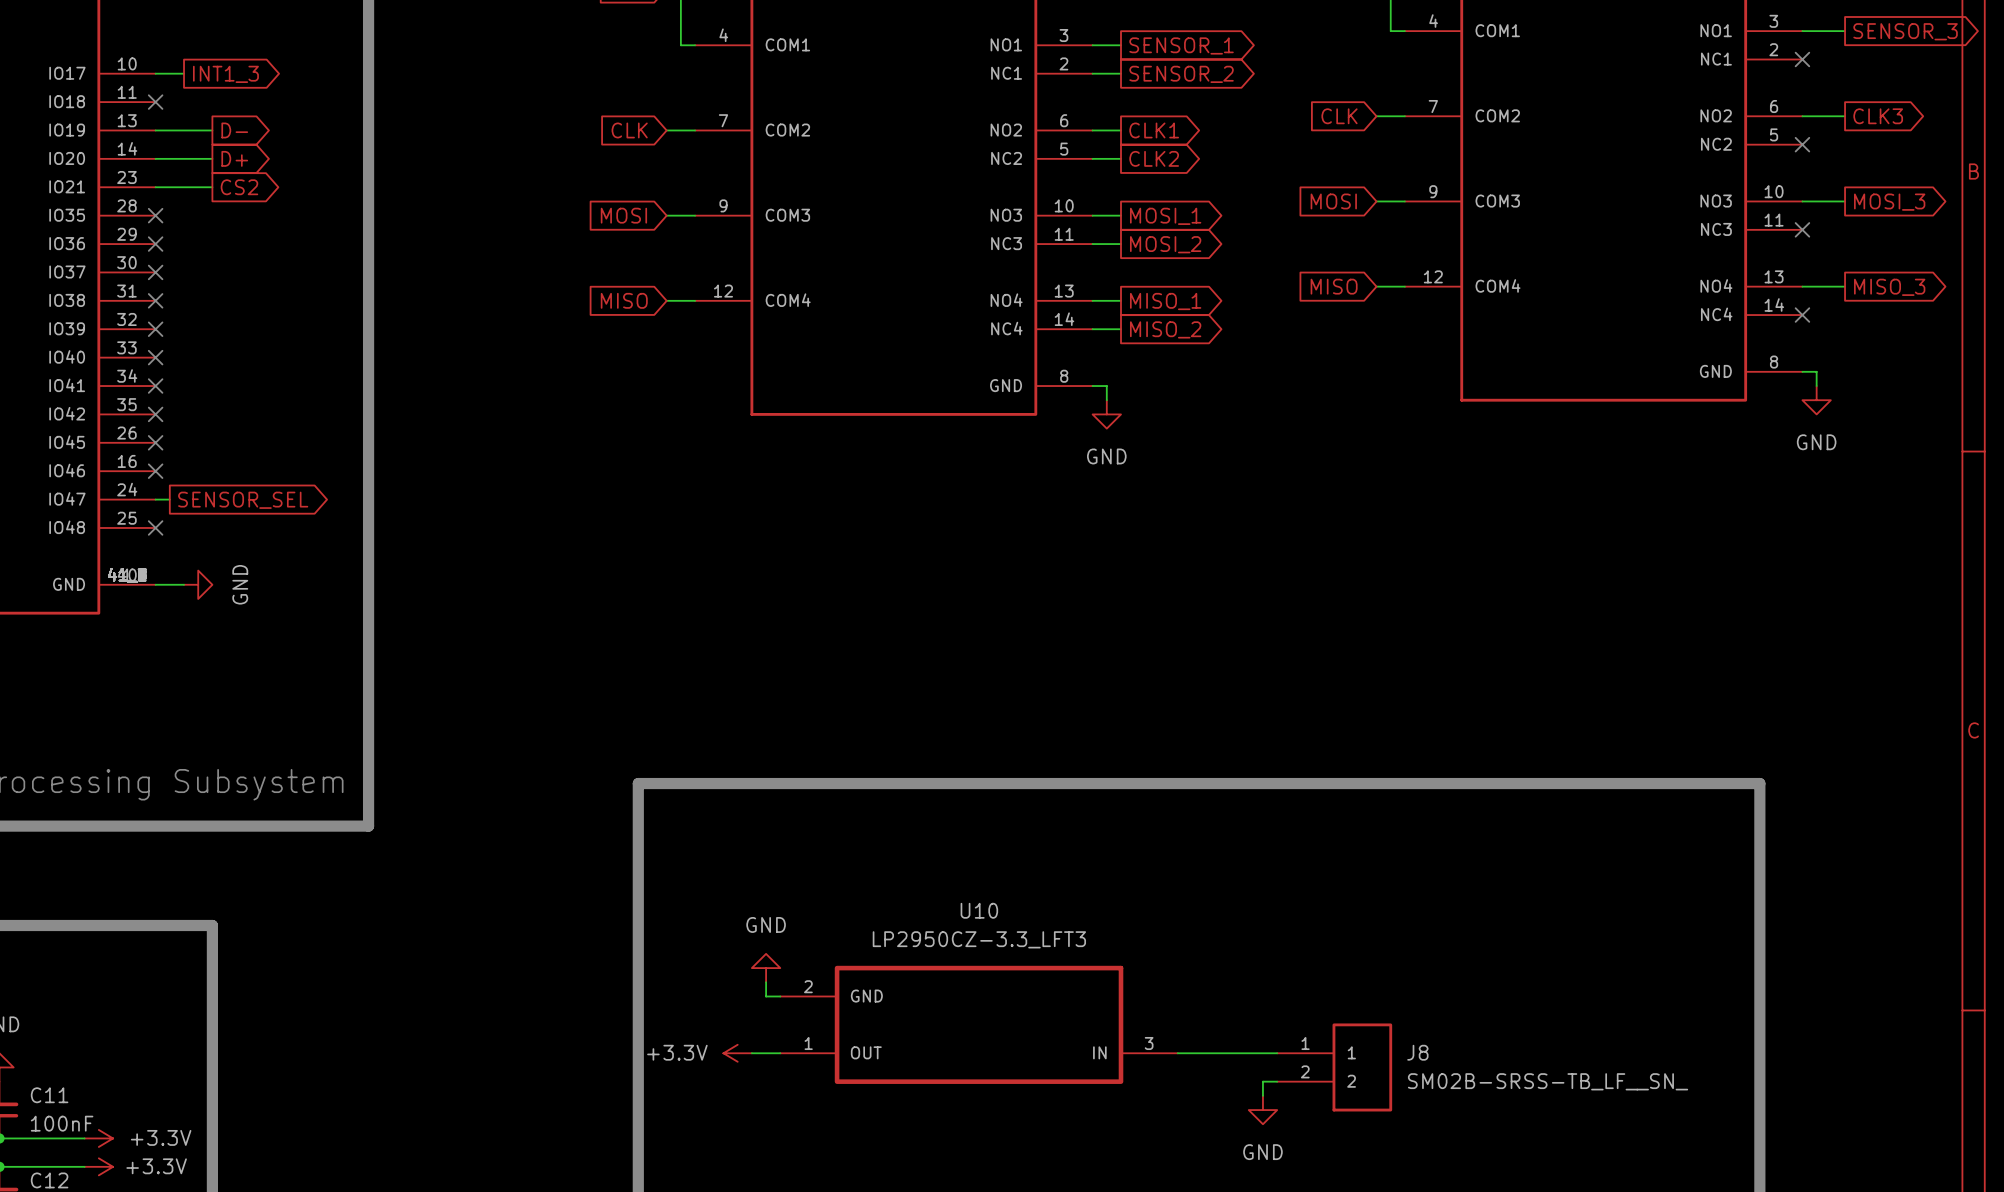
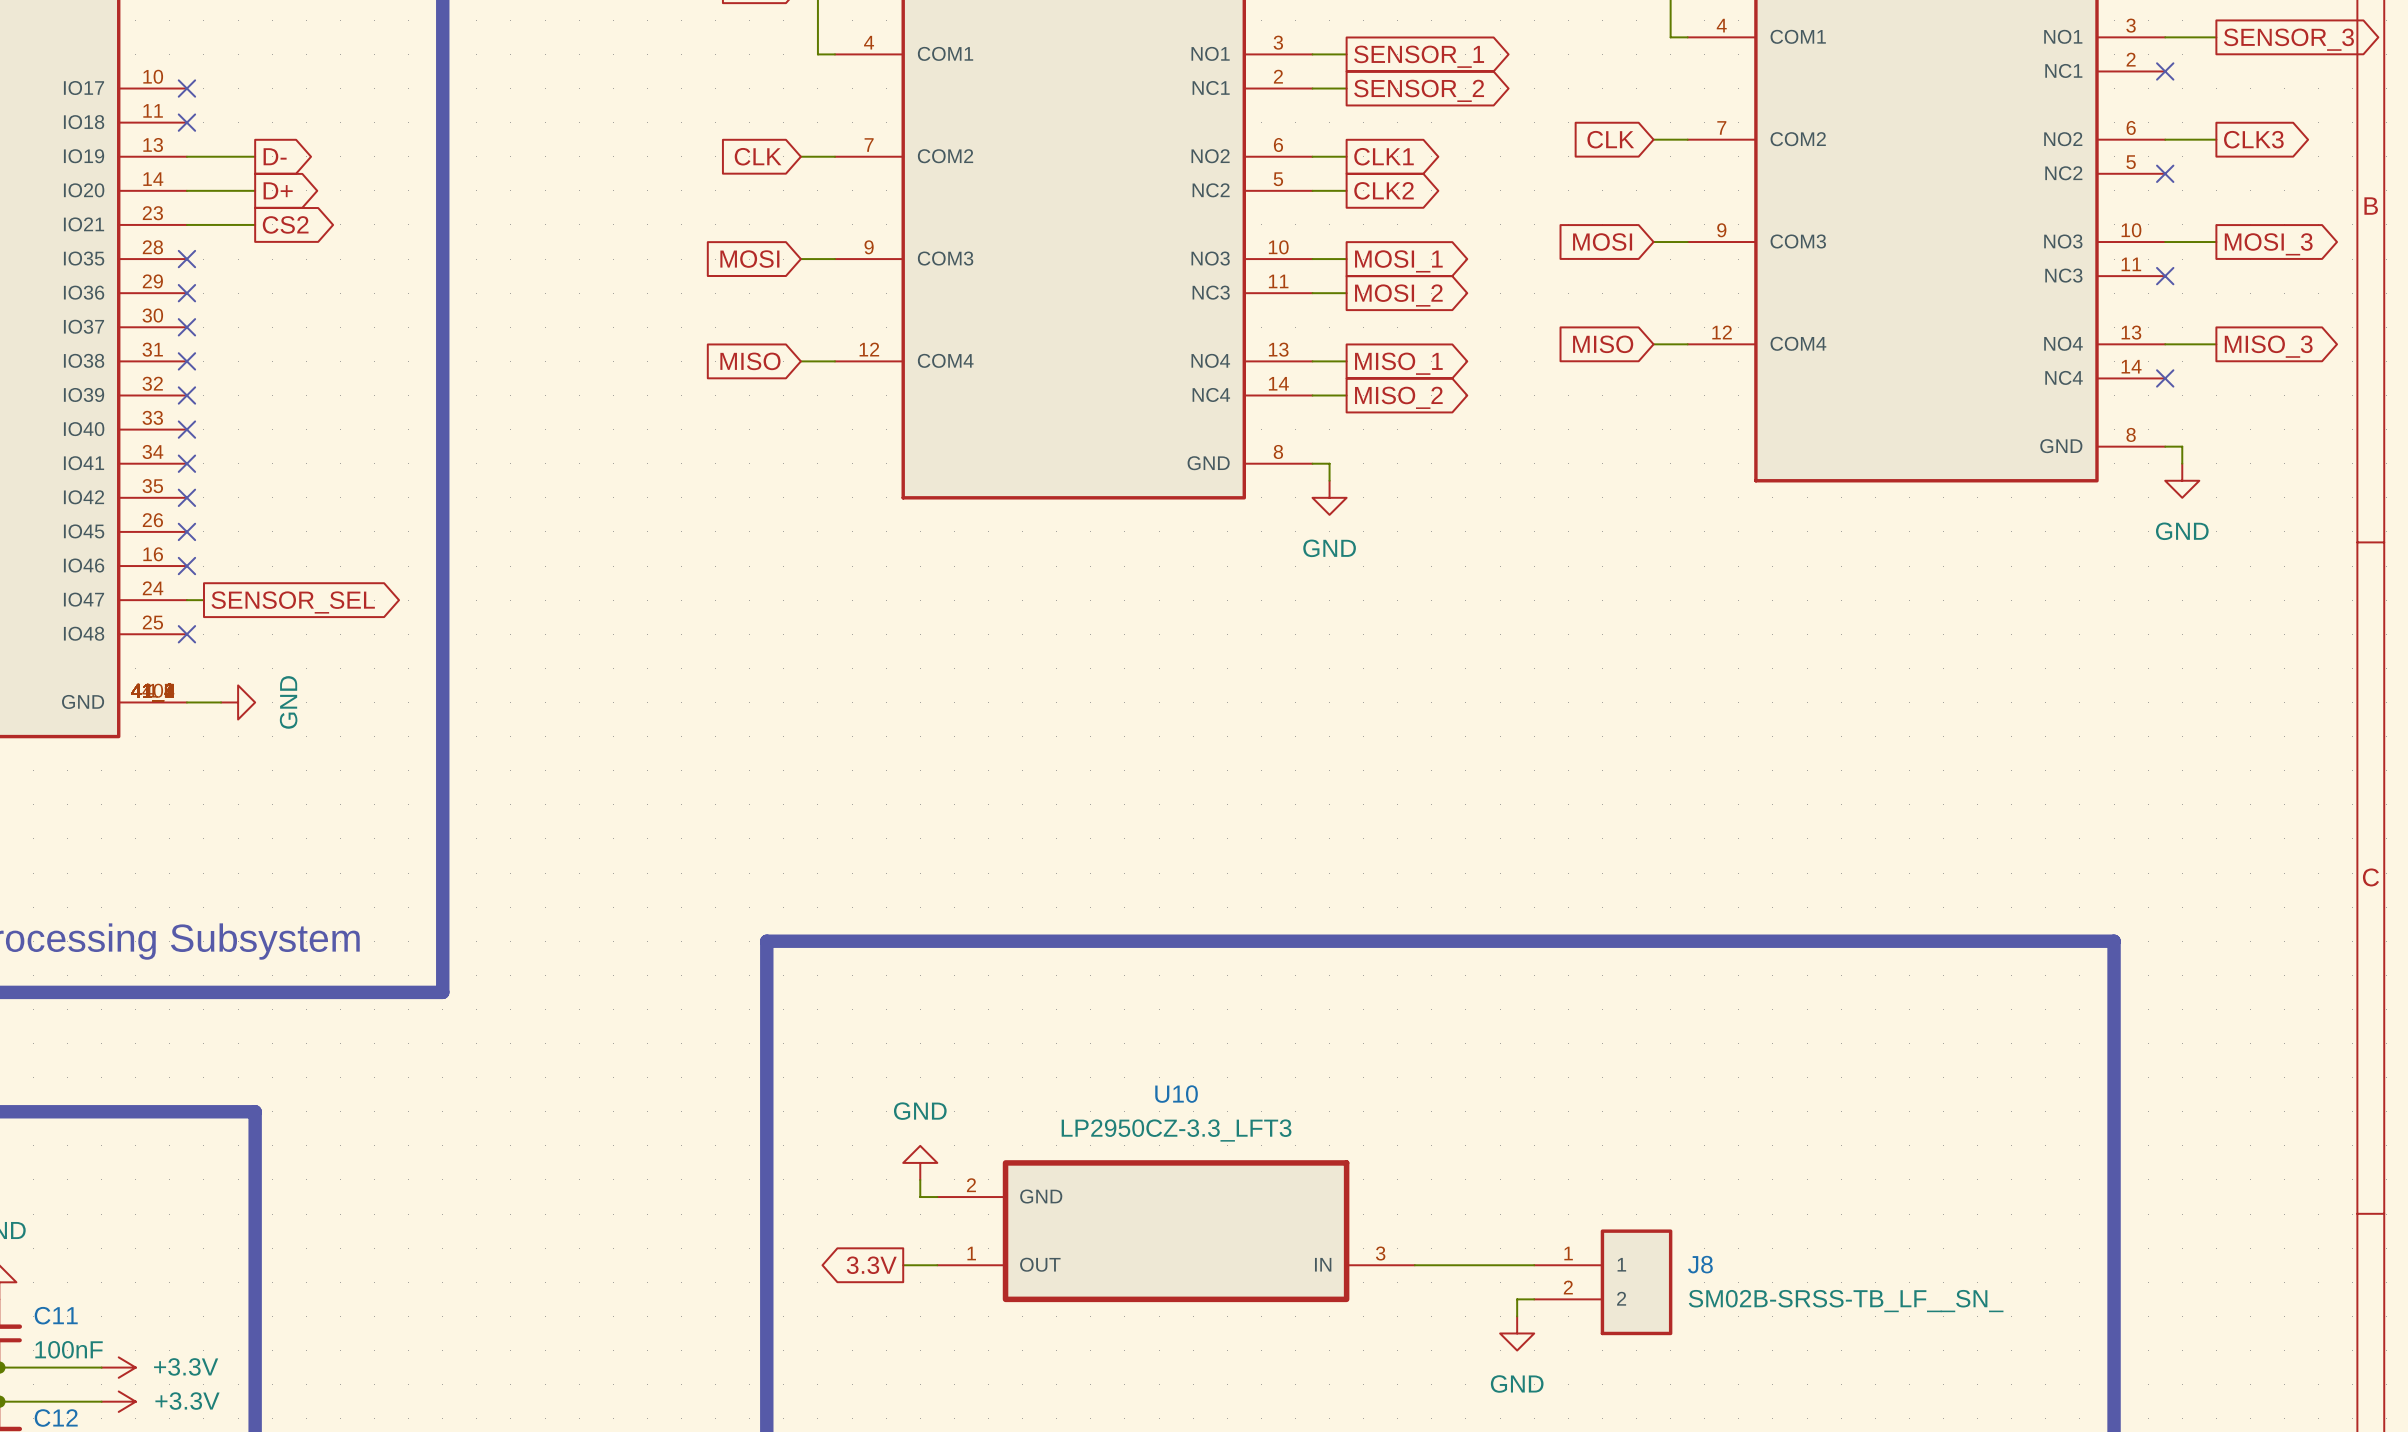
wire: (155, 73) (184, 73) -> none
no-connect mark: none -> (186, 88)
global label: INT1_3 (225, 74) -> none
global label: none -> 3.3V (871, 1265)
power symbol: +3.3V (737, 1053) -> none

